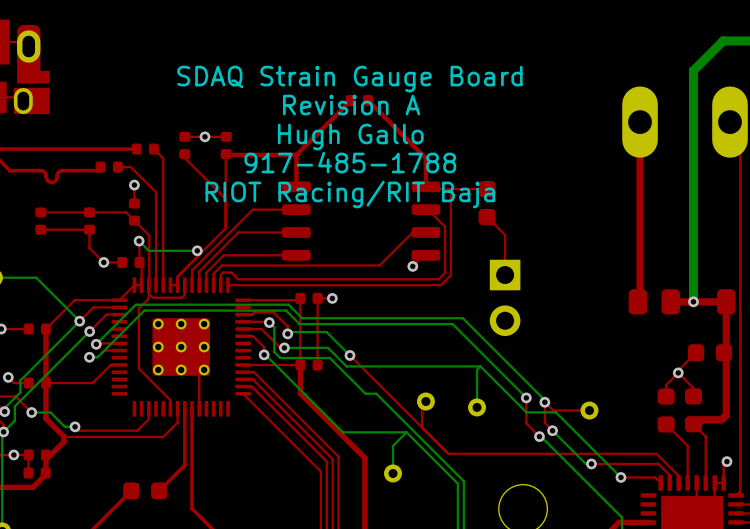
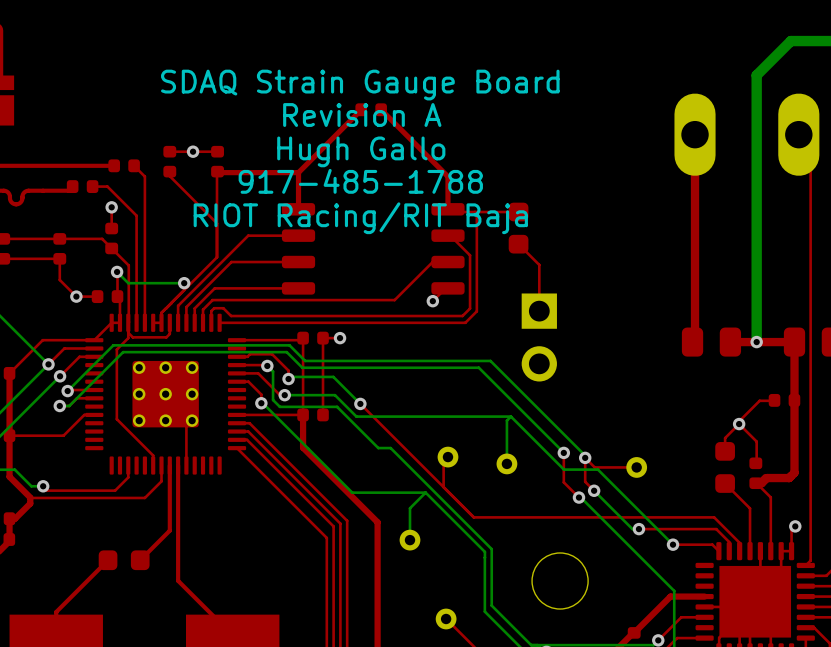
part footprint: [687, 344, 733, 362] -> [768, 393, 801, 407]
top track: none -> (774, 400) (759, 400)
part footprint: [684, 388, 703, 433] -> [749, 457, 763, 490]
top track: none -> (756, 451) (755, 463)

